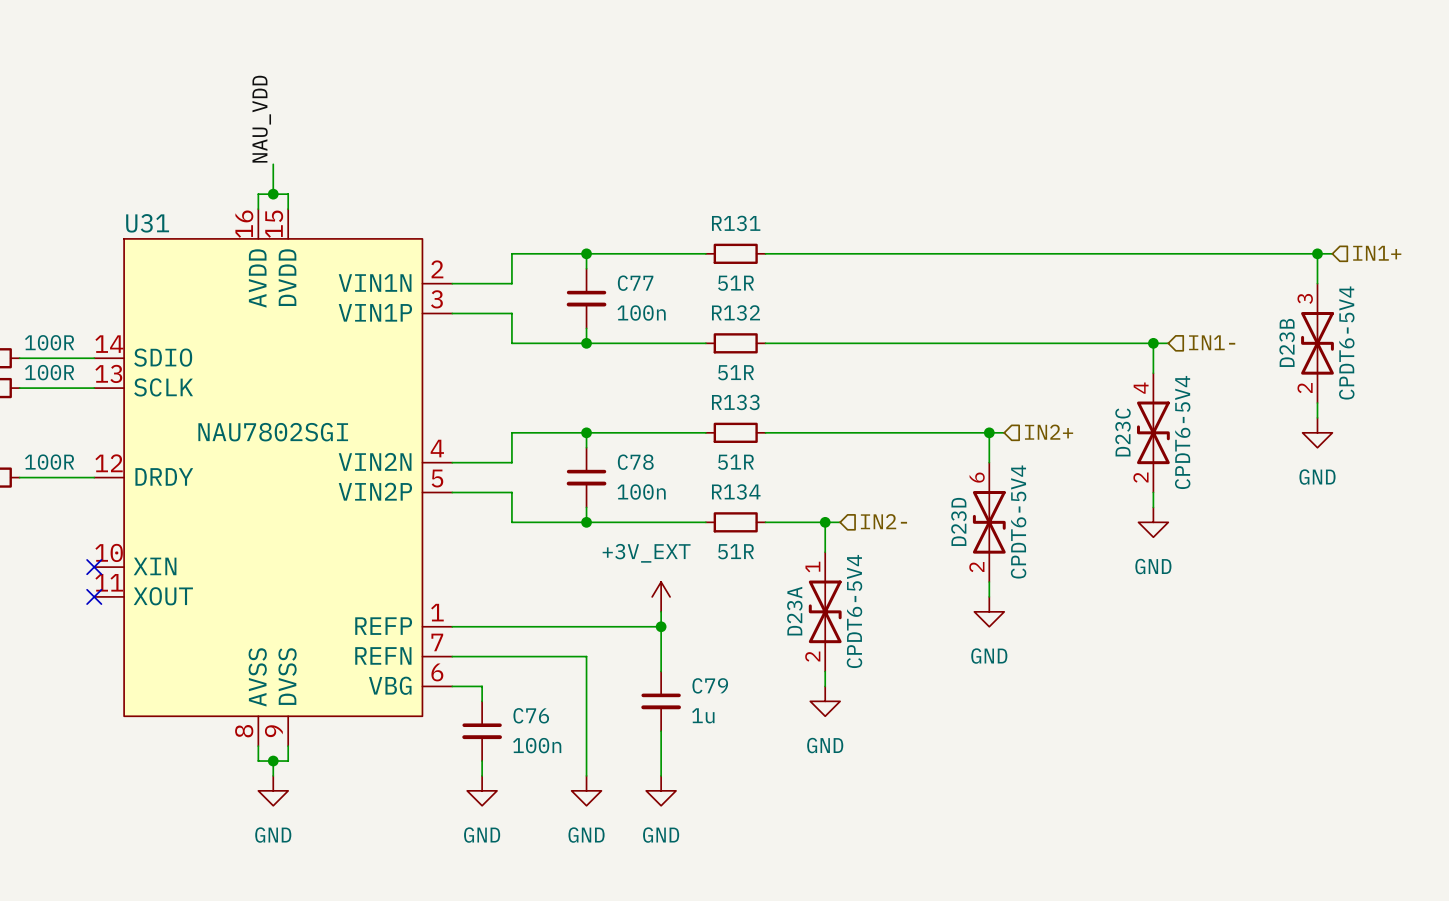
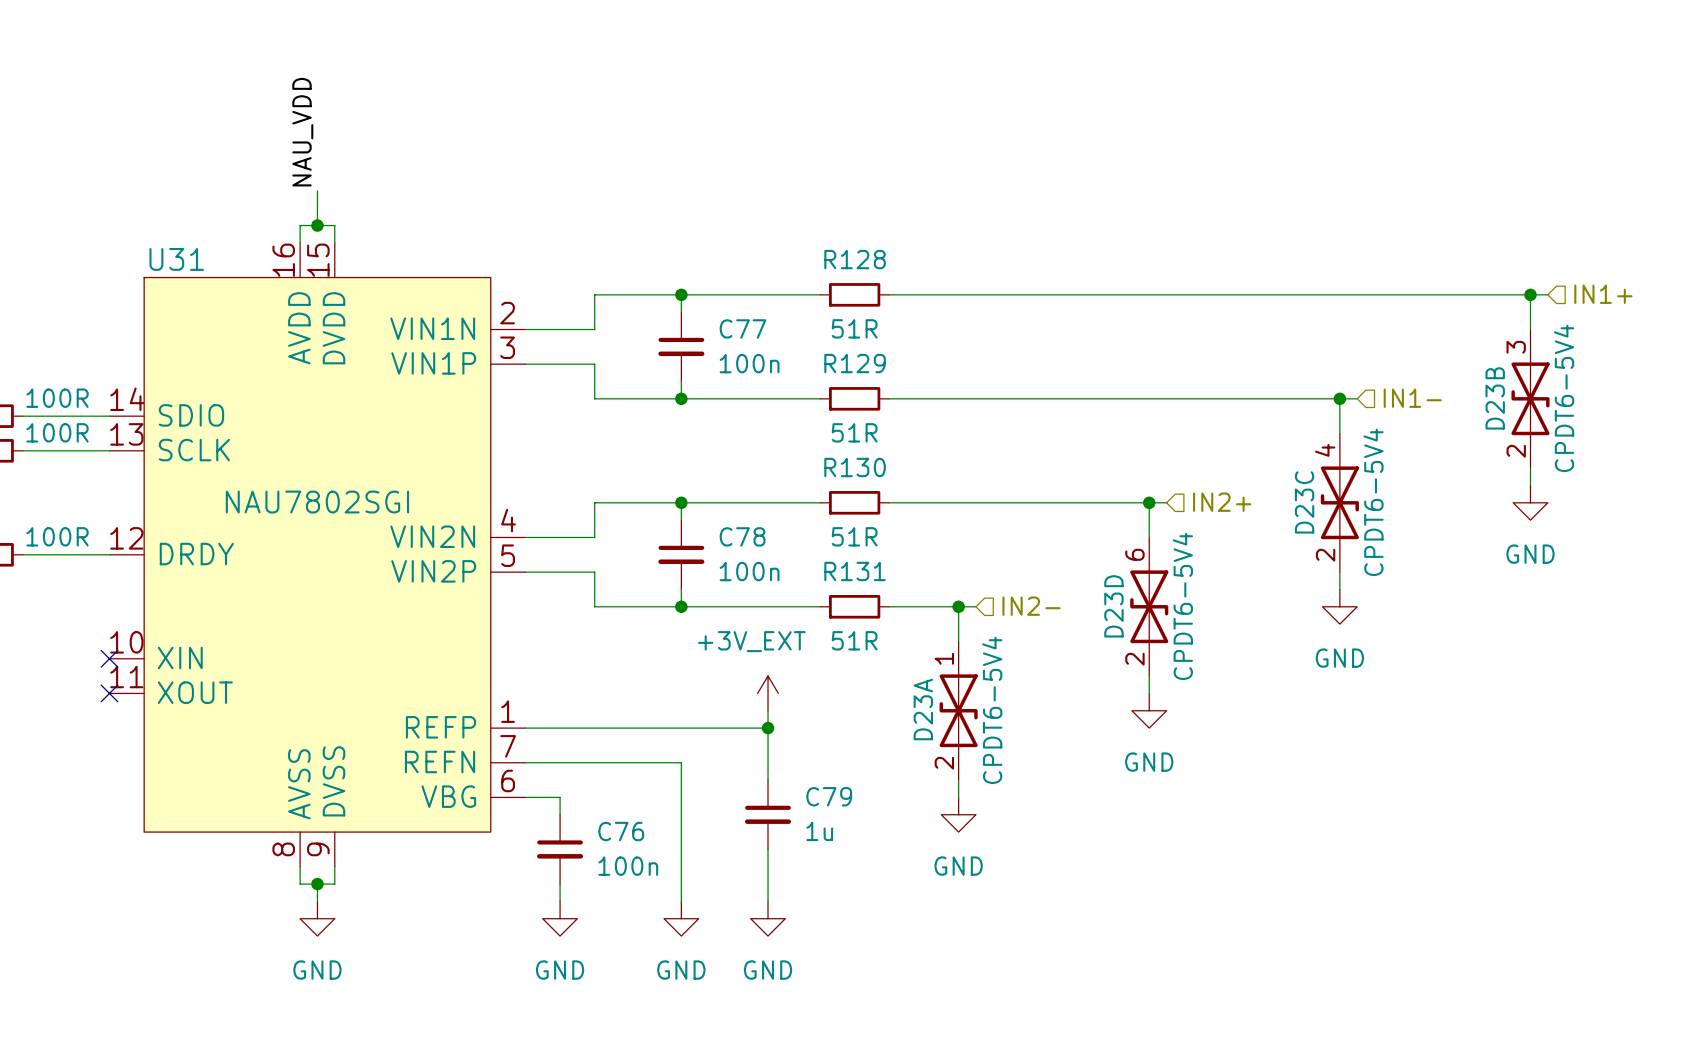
R131 name: R131 (736, 223) -> R128 (855, 259)
R132 name: R132 (736, 312) -> R129 (855, 363)
R133 name: R133 (735, 402) -> R130 (855, 467)
R134 name: R134 (736, 491) -> R131 (855, 571)

